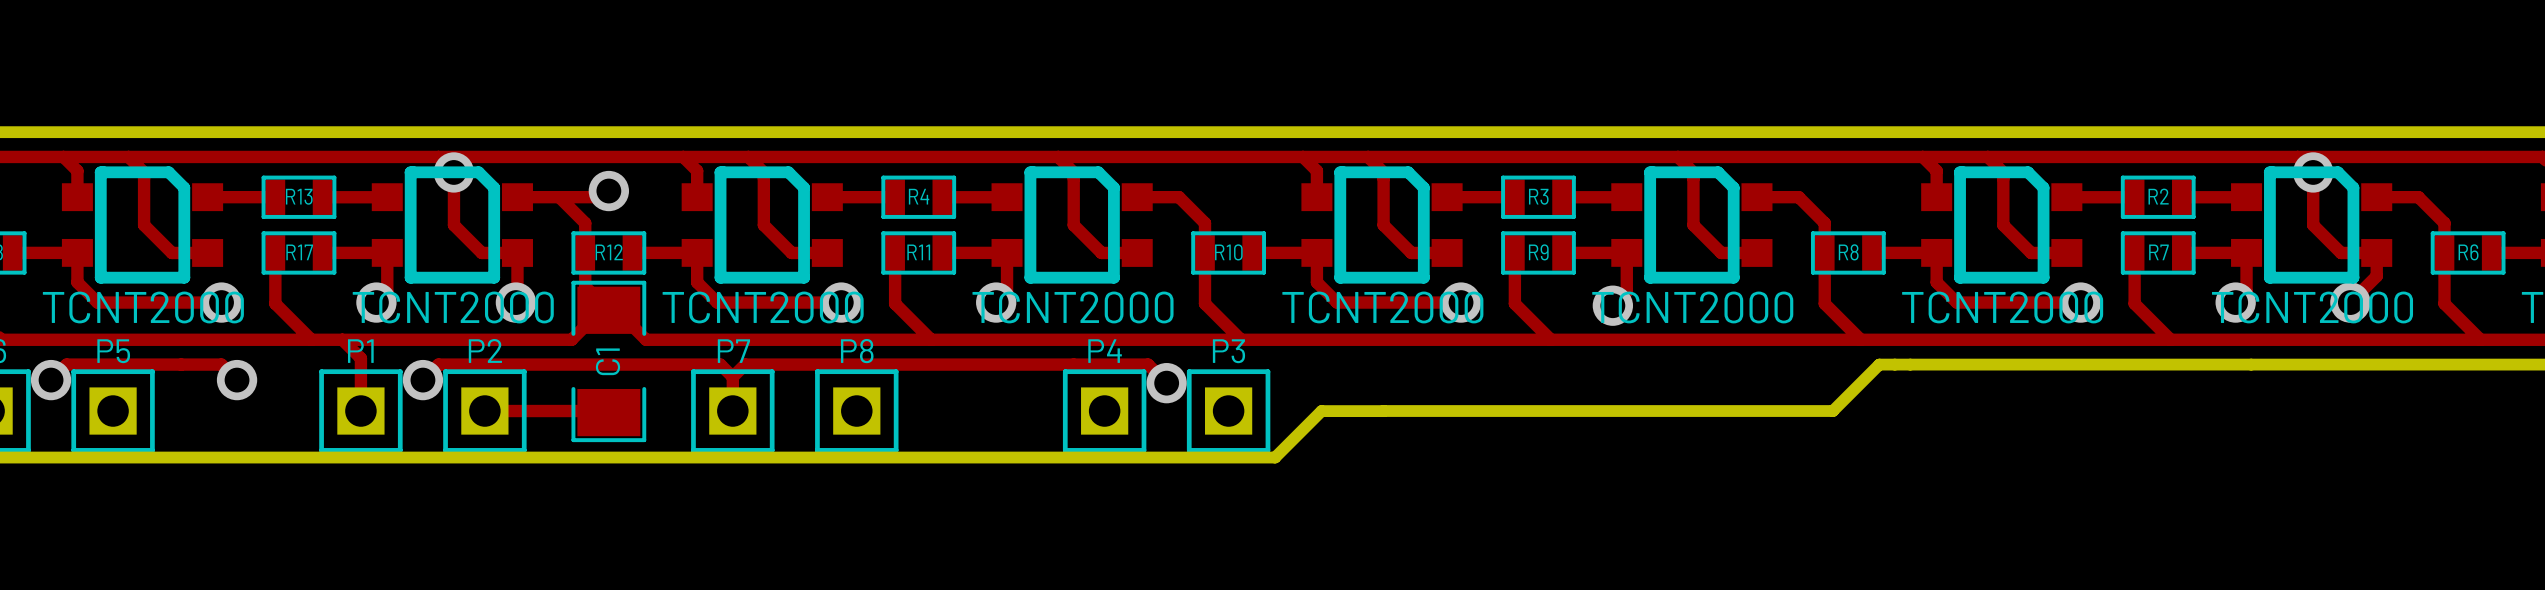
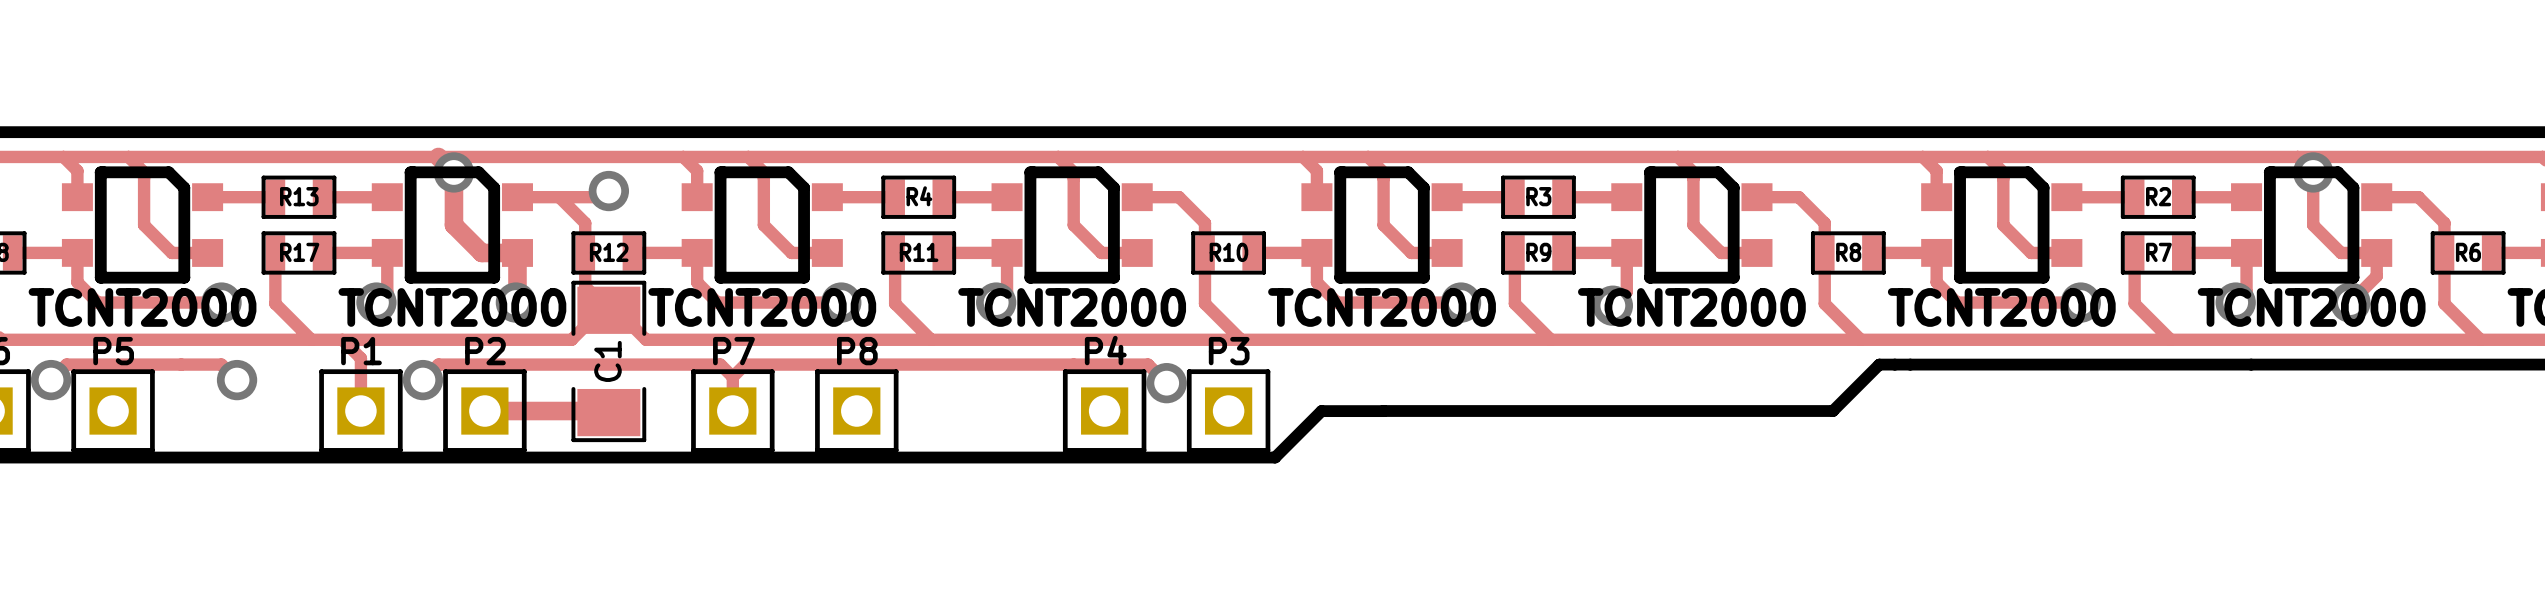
track width: thin (438, 156) (453, 172) (453, 225) (481, 252) (517, 252) (517, 300) (515, 302) -> thick (438, 156) (453, 172) (453, 225) (481, 252) (517, 252) (517, 300) (515, 302)
track width: thin (484, 411) (607, 411) -> thick (484, 411) (607, 411)

